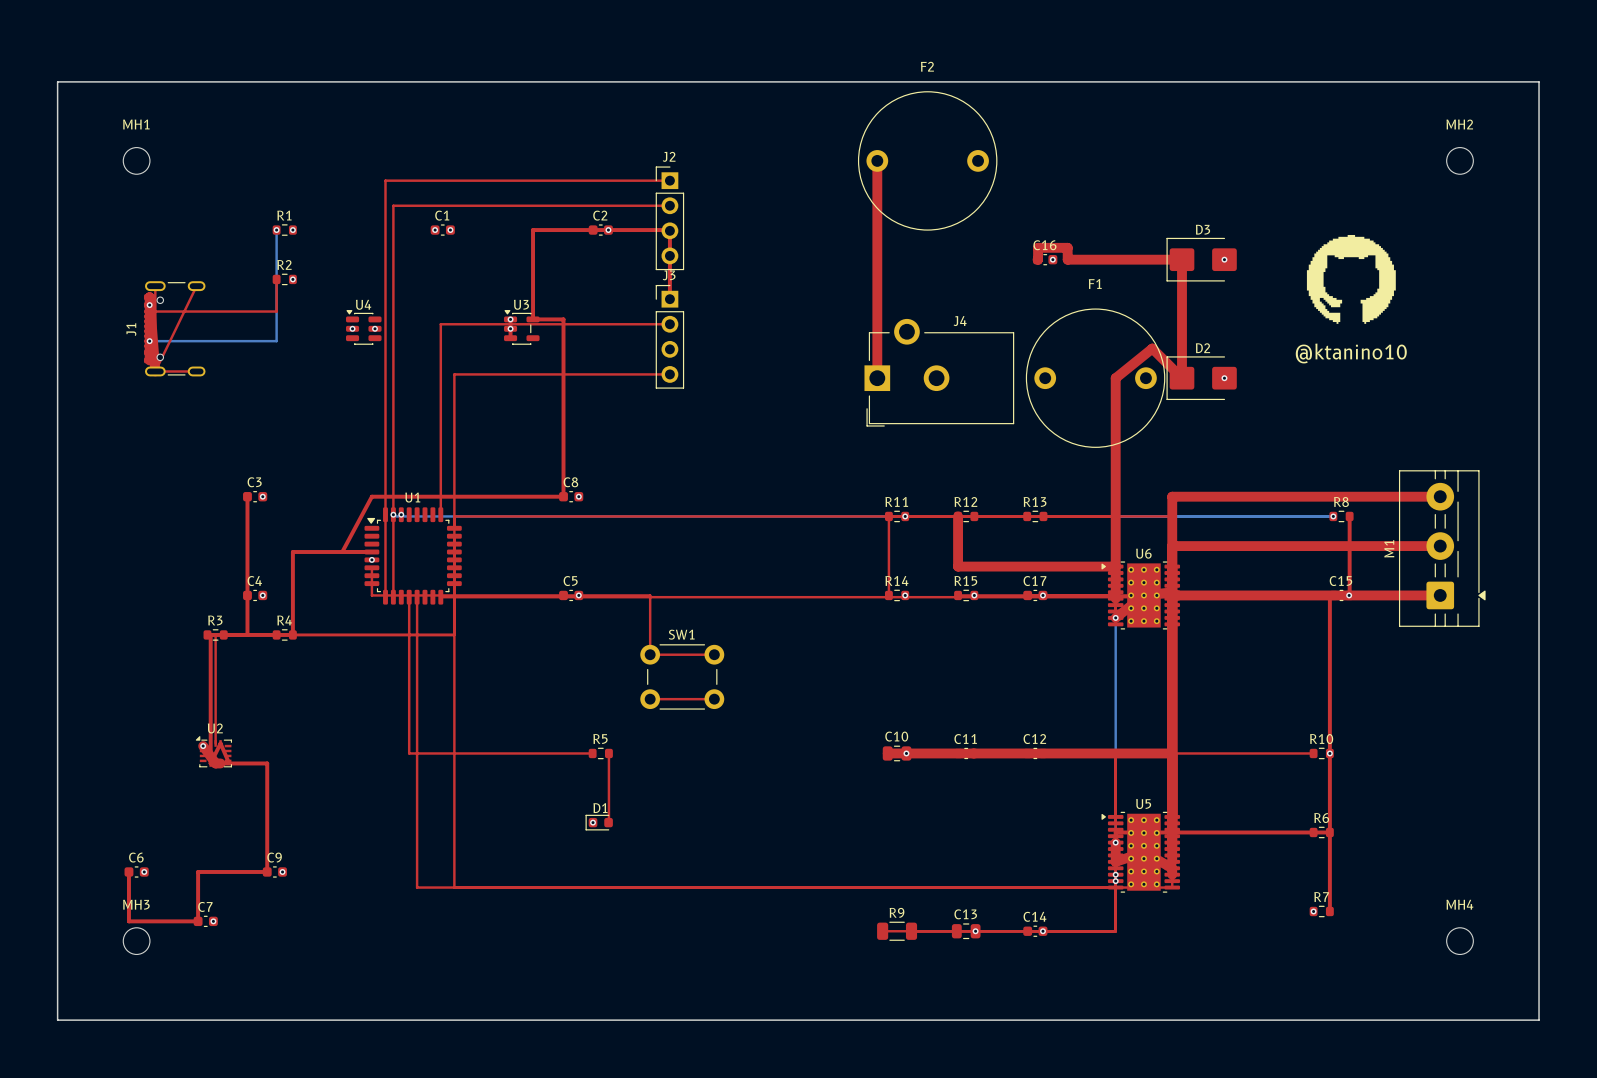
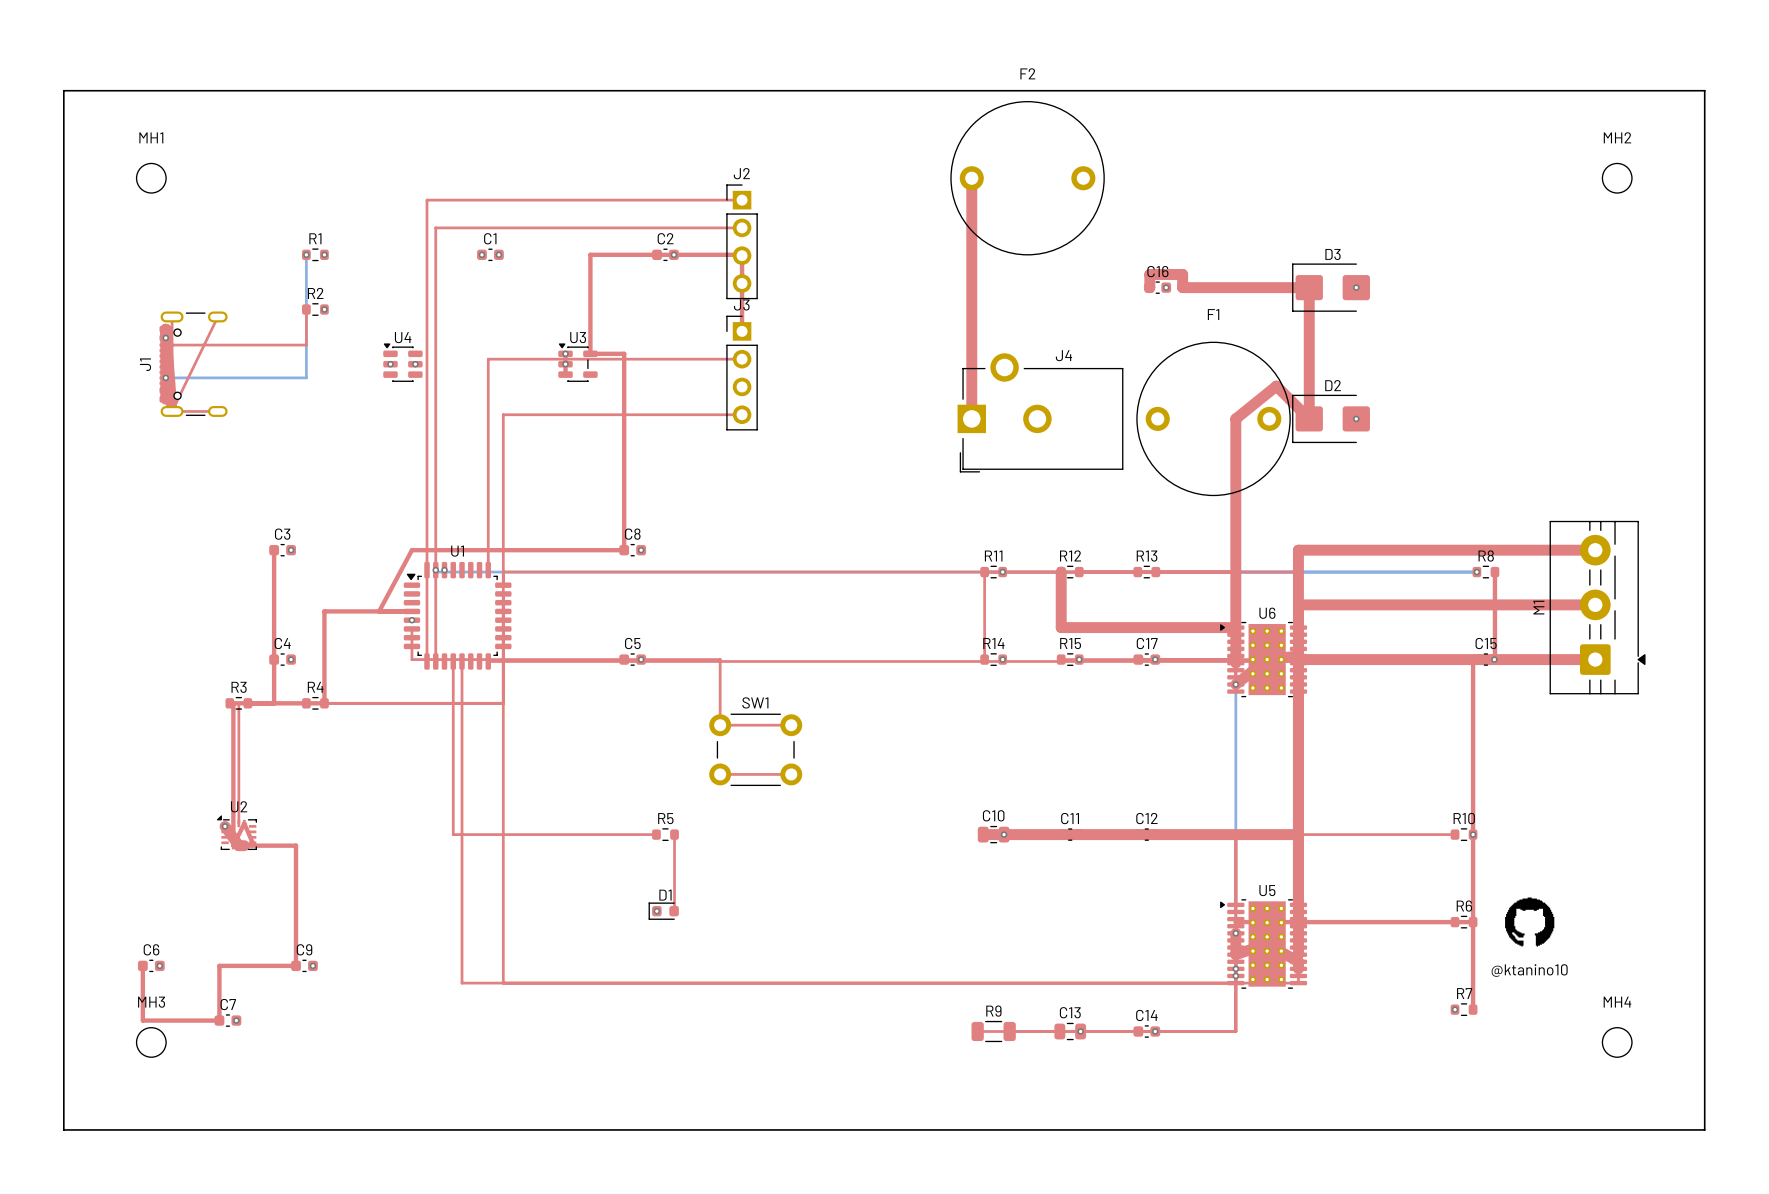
drawing: [1306, 234, 1396, 324] -> none
drawing: none -> [1505, 897, 1555, 947]

